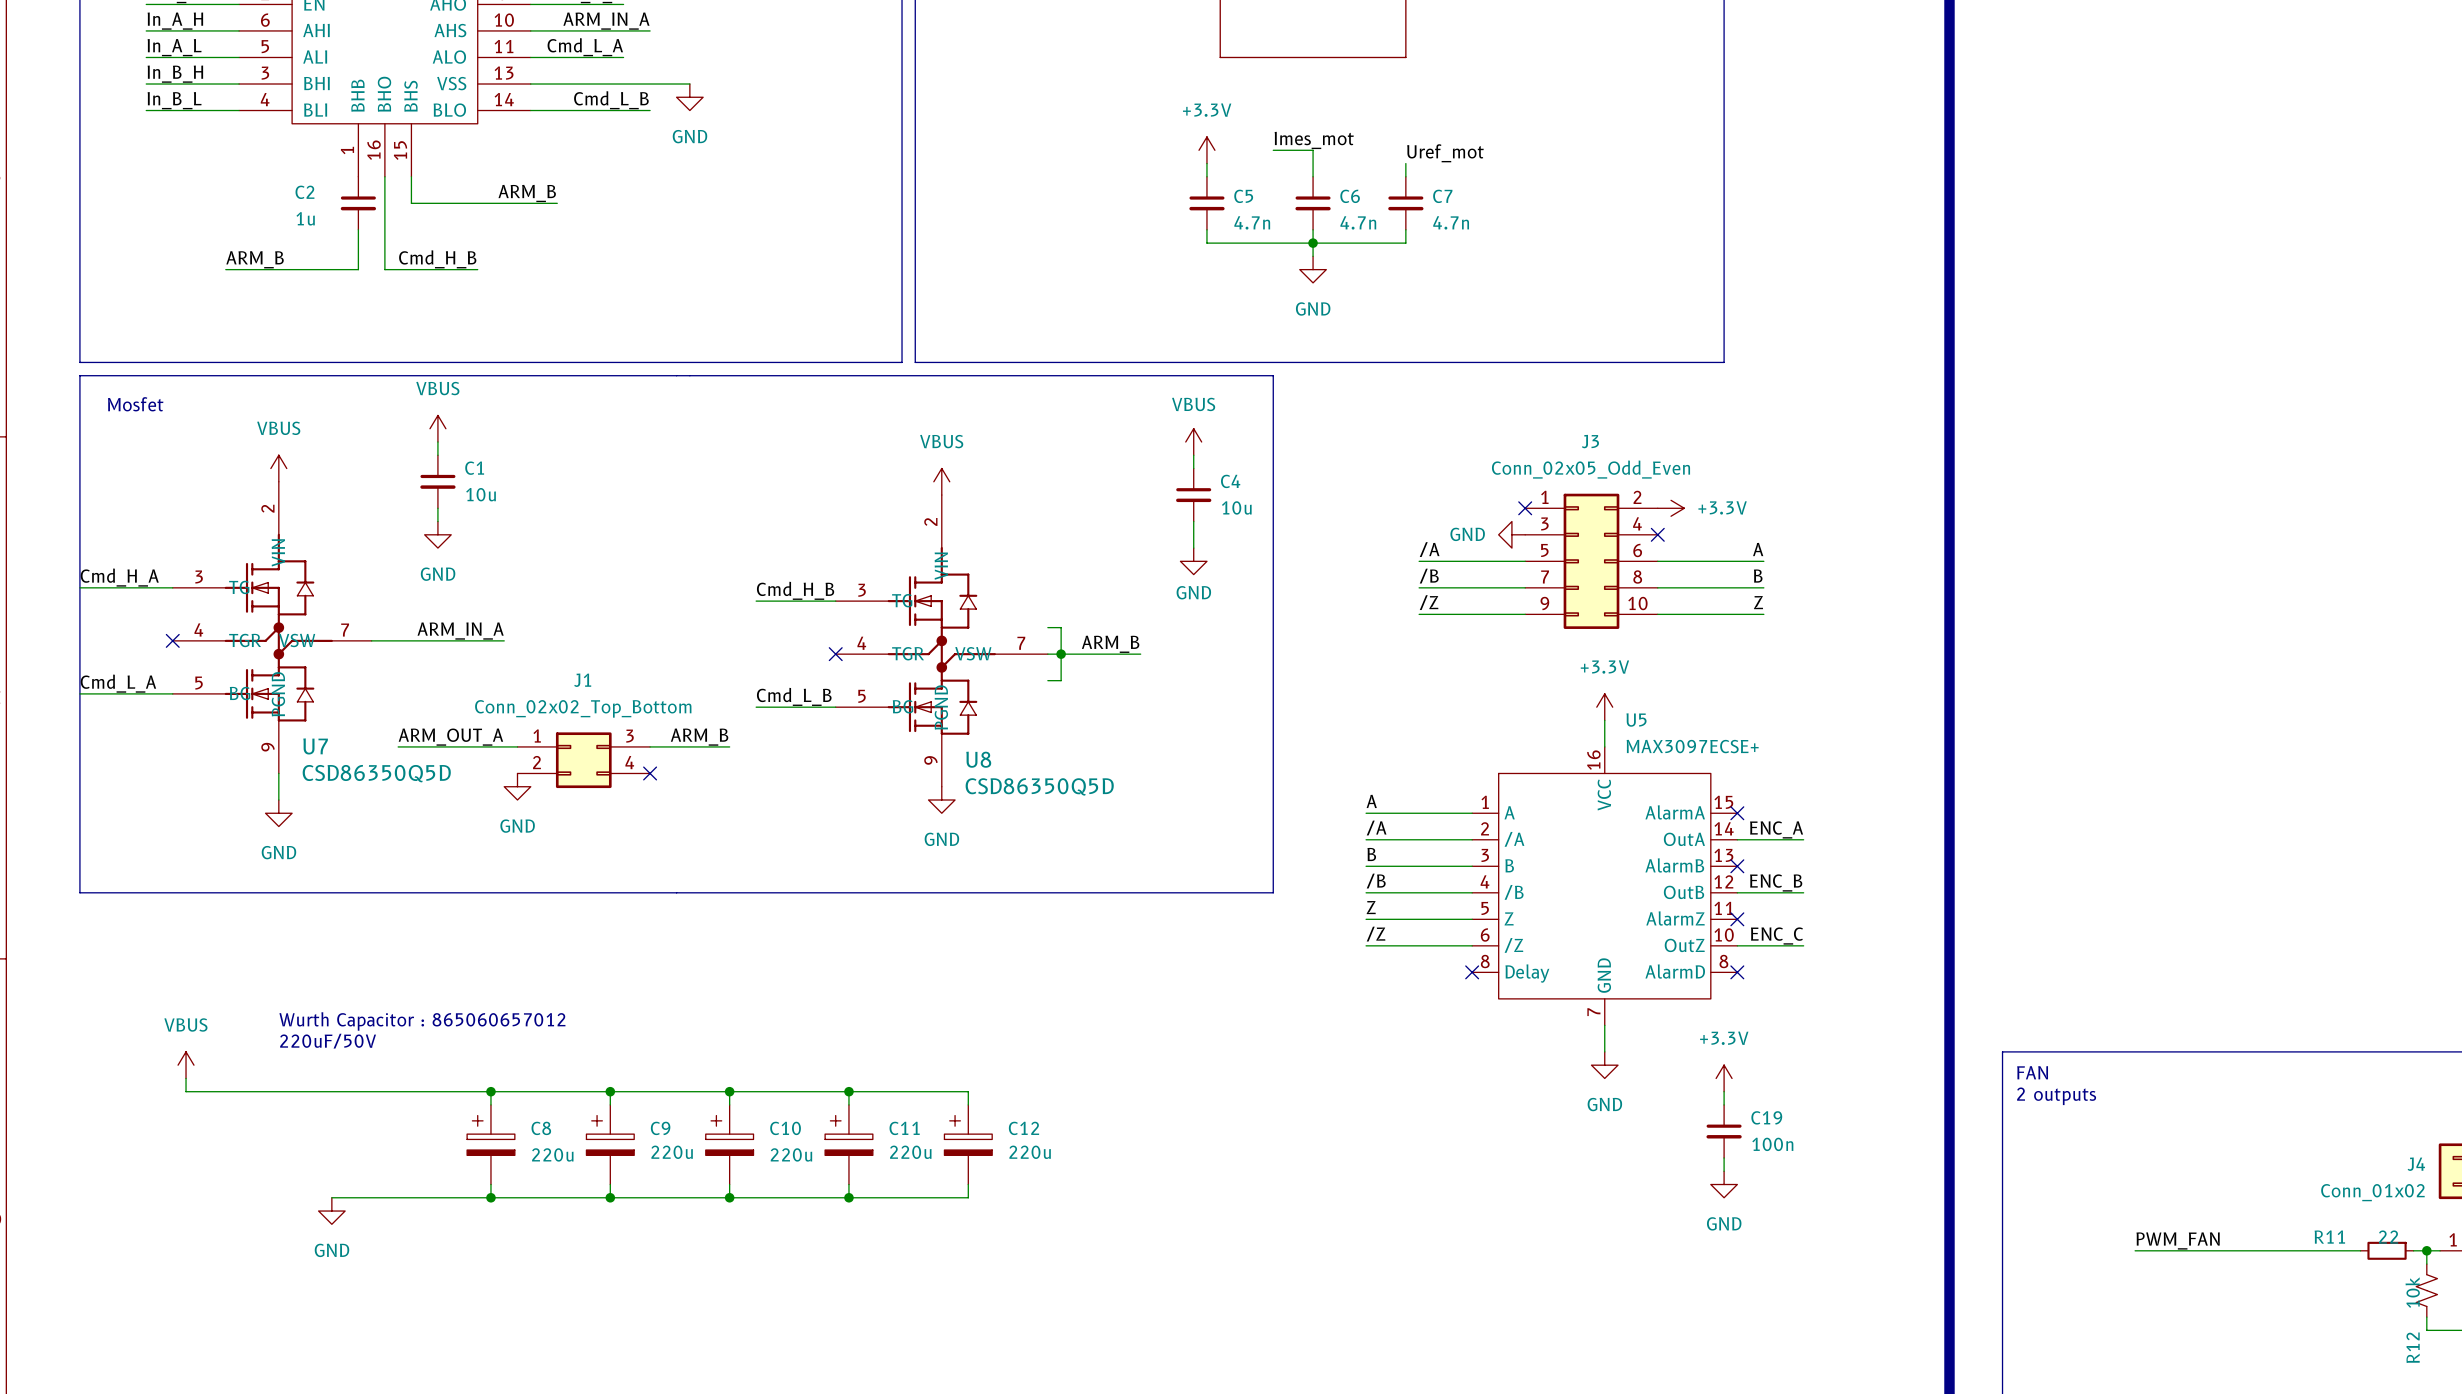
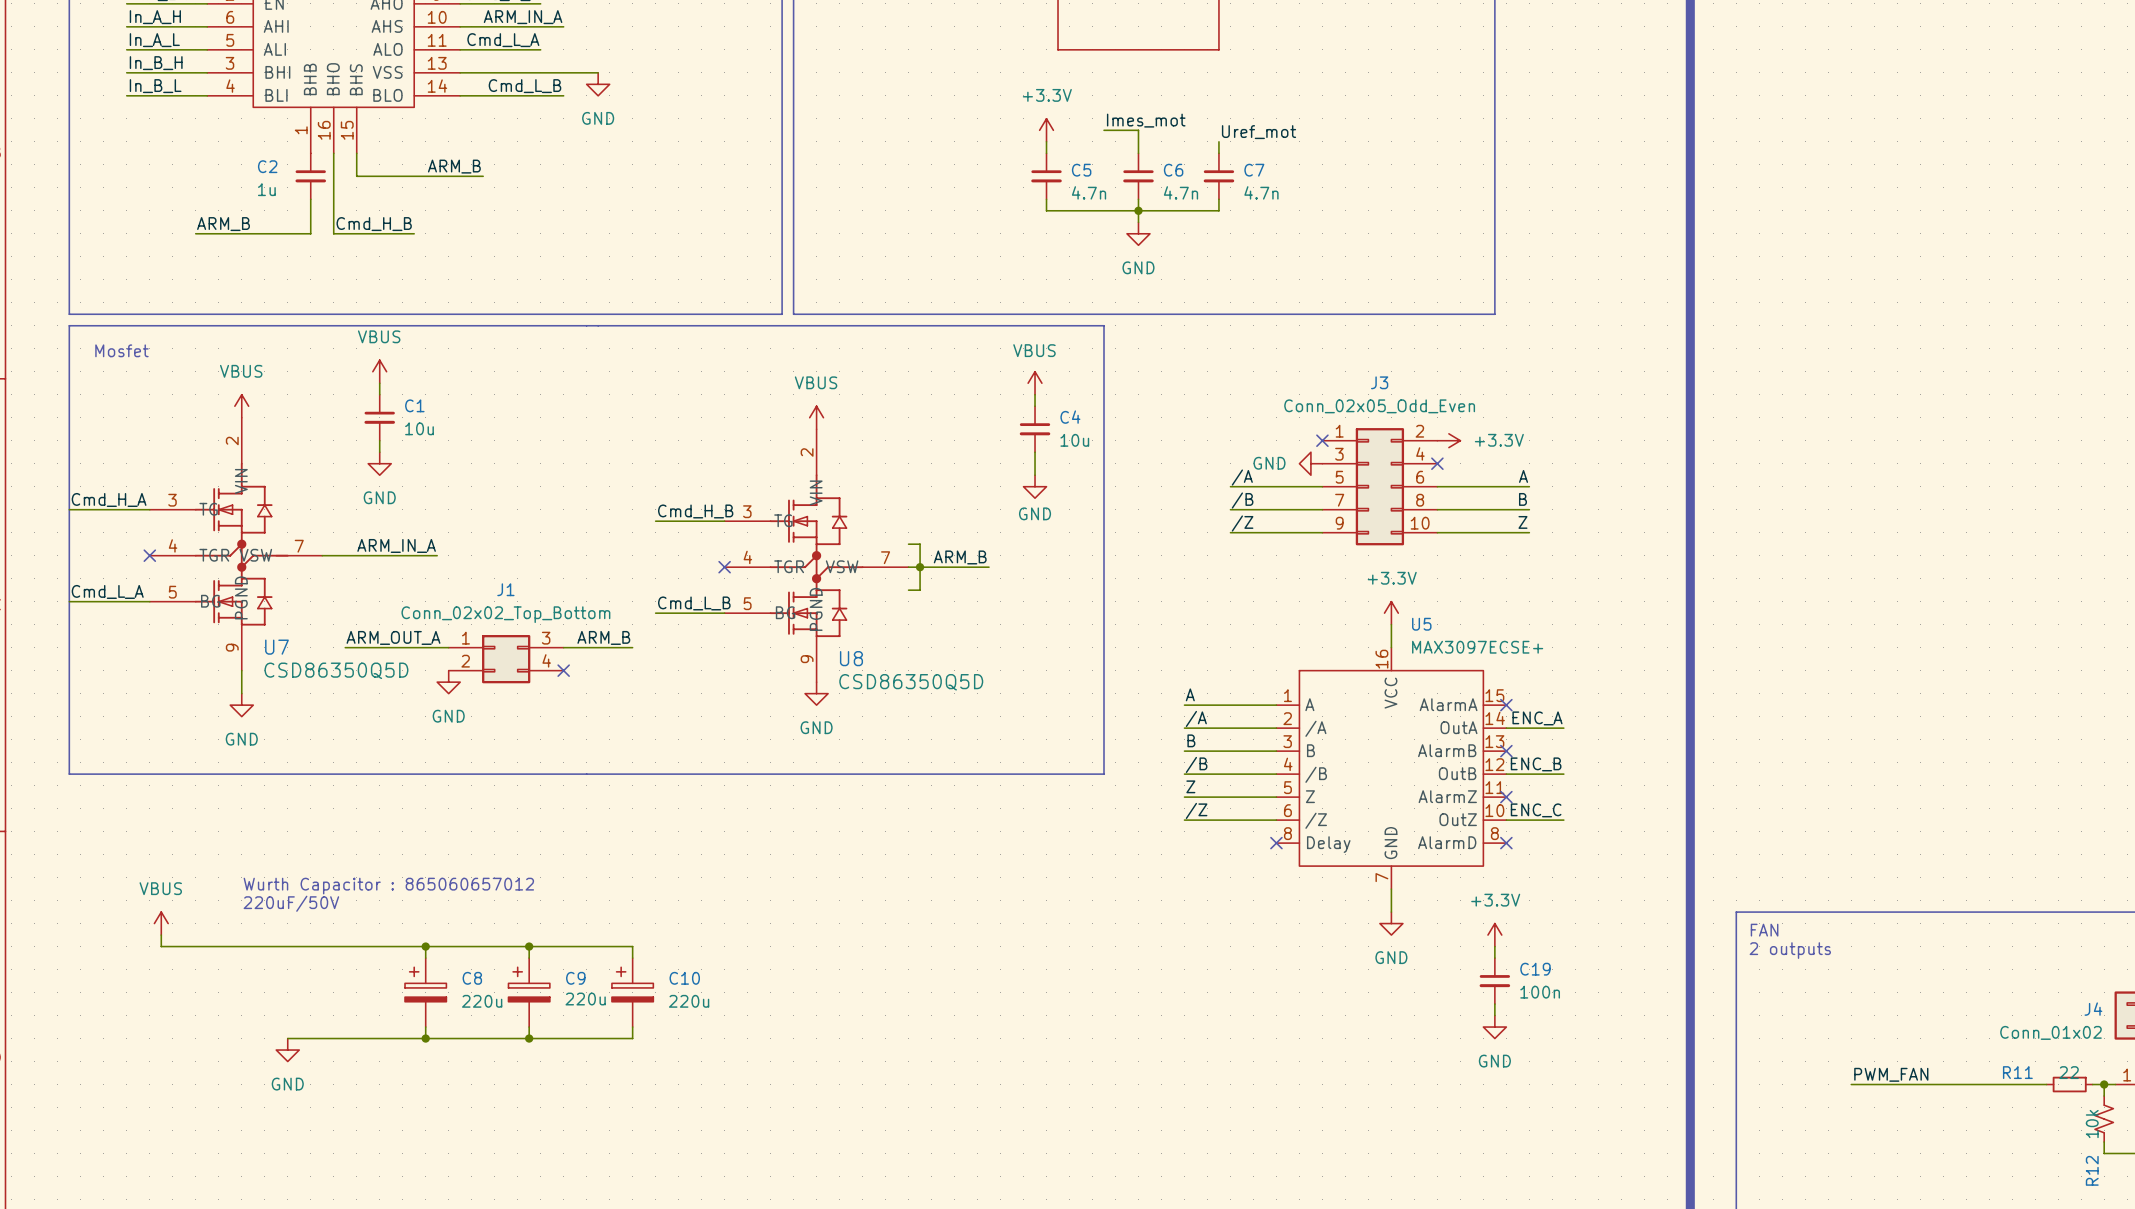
wire: (729, 1091) (968, 1091) (968, 1104) -> none
junction: (729, 1091) -> none
wire: (848, 1091) (848, 1104) -> none
junction: (848, 1091) -> none
C11: 220u (848, 1144) -> none
C12: 220u (968, 1144) -> none
wire: (848, 1184) (848, 1197) -> none
wire: (968, 1184) (968, 1197) (729, 1197) -> none
junction: (729, 1197) -> none
junction: (848, 1197) -> none

